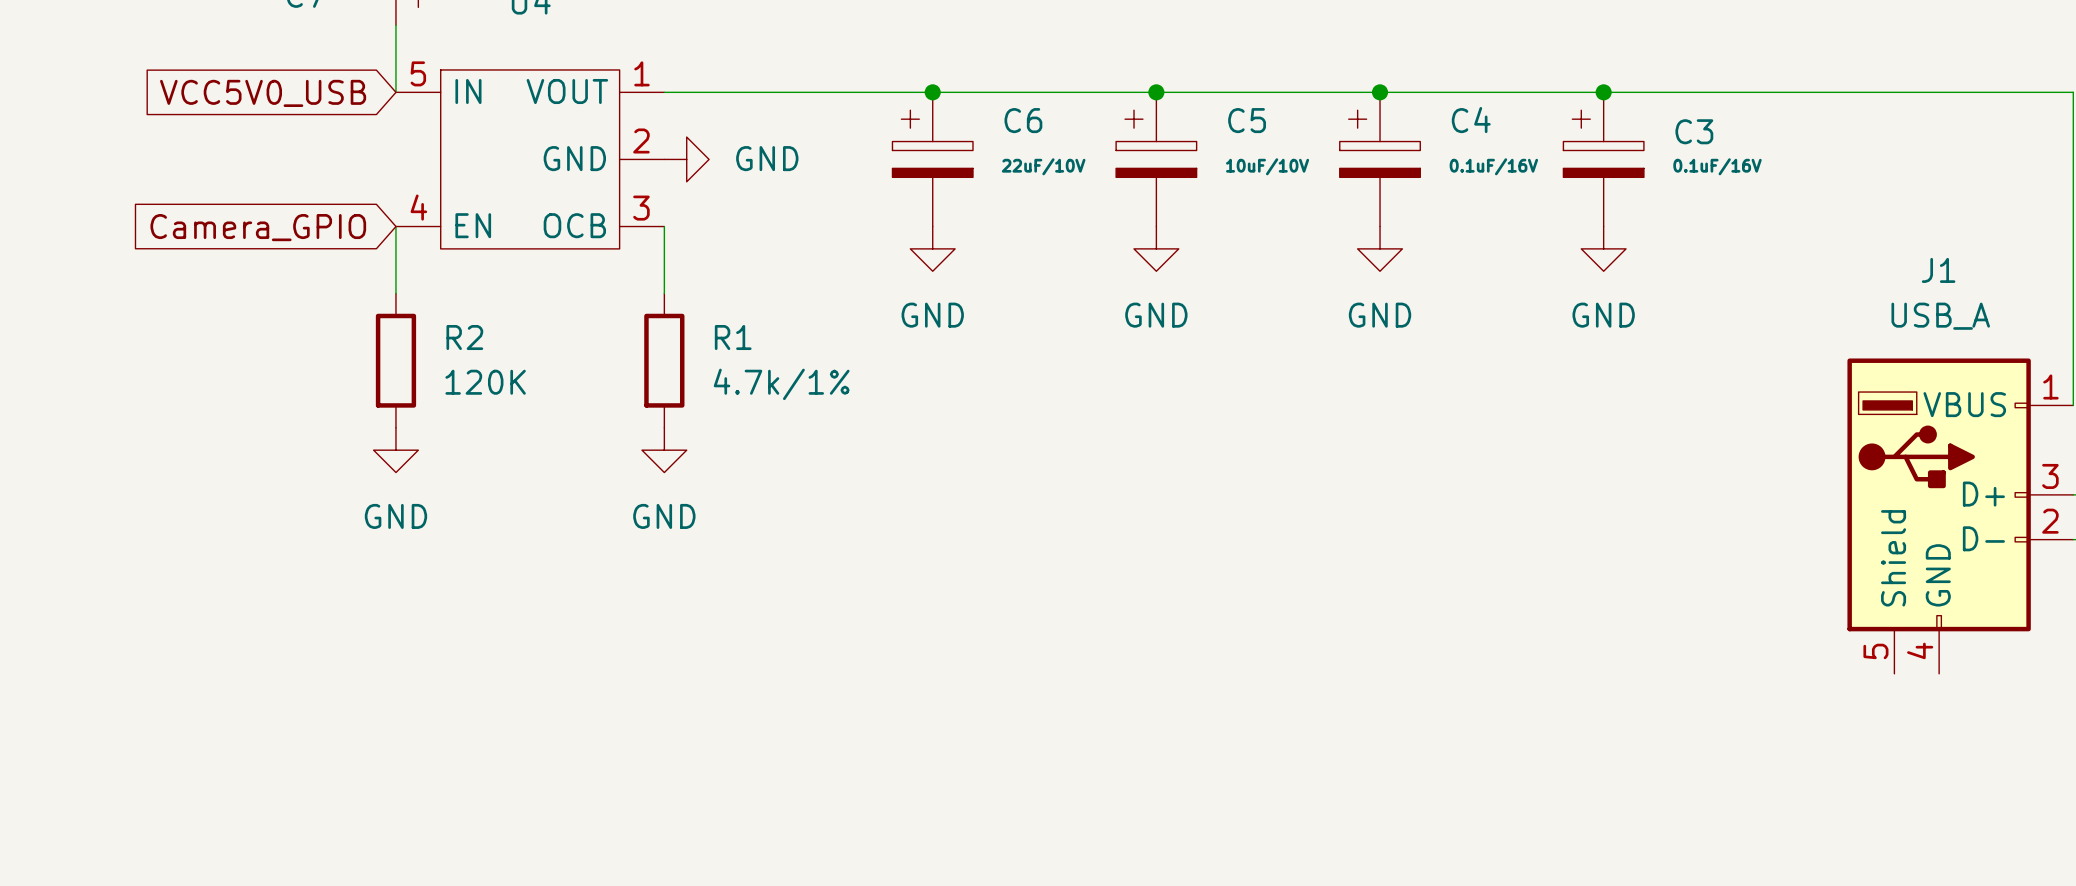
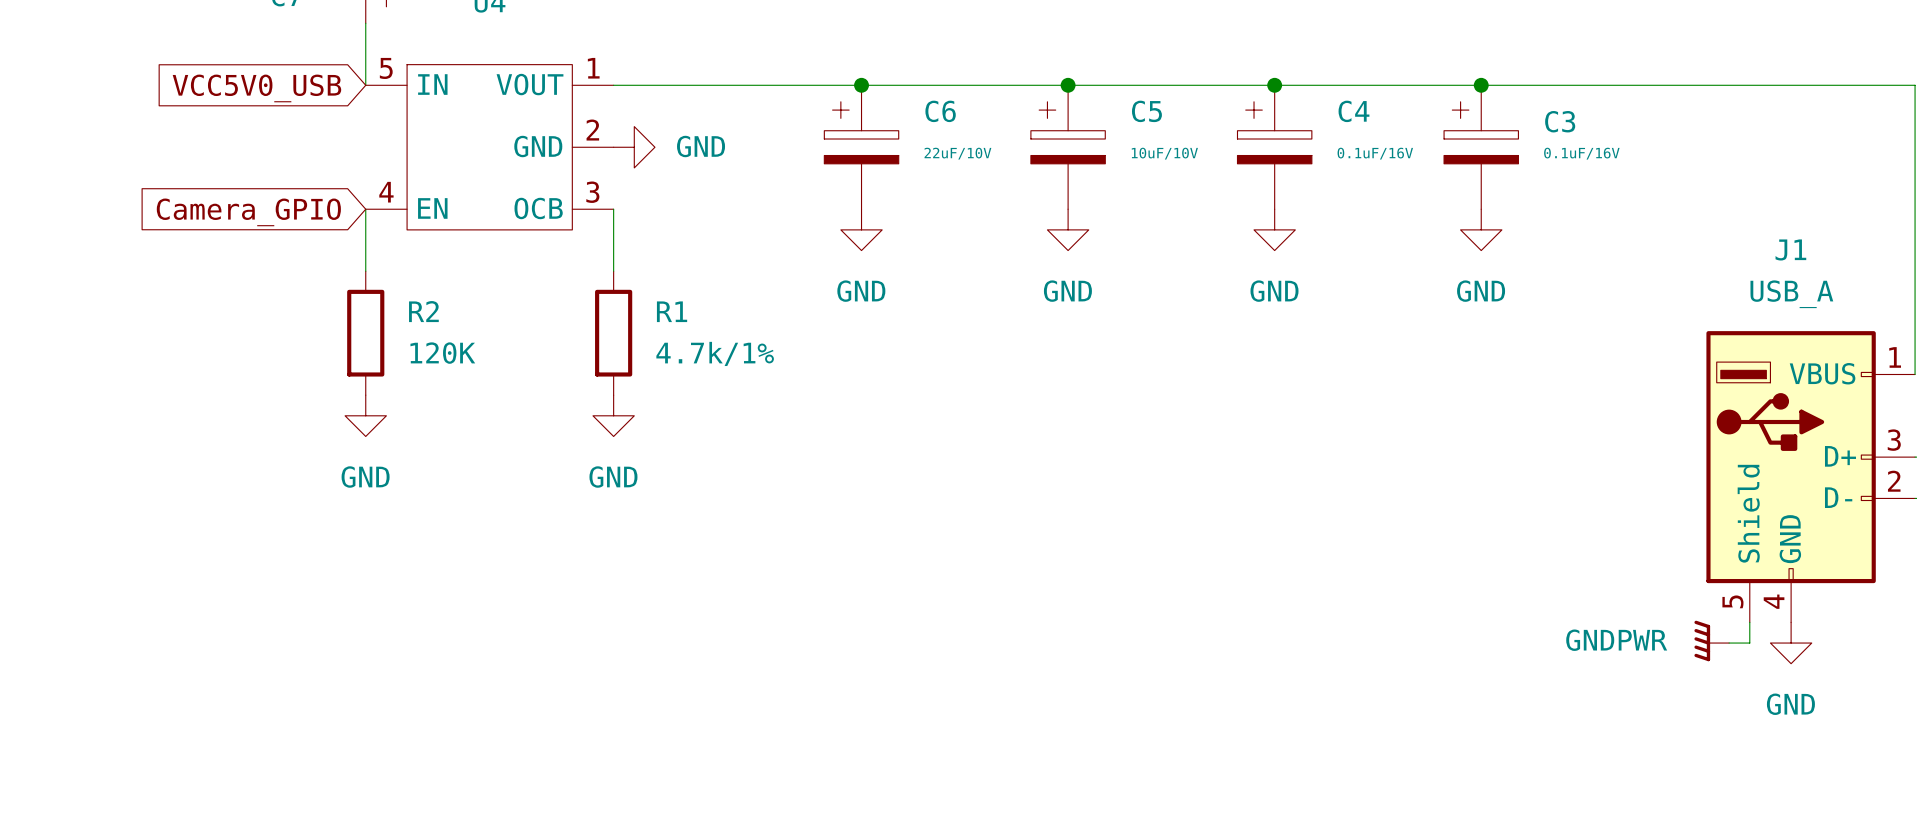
wire: none -> (1749, 622) (1749, 643) (1729, 643)
power symbol: none -> GNDPWR (1711, 640)
power symbol: none -> GND (1791, 643)

